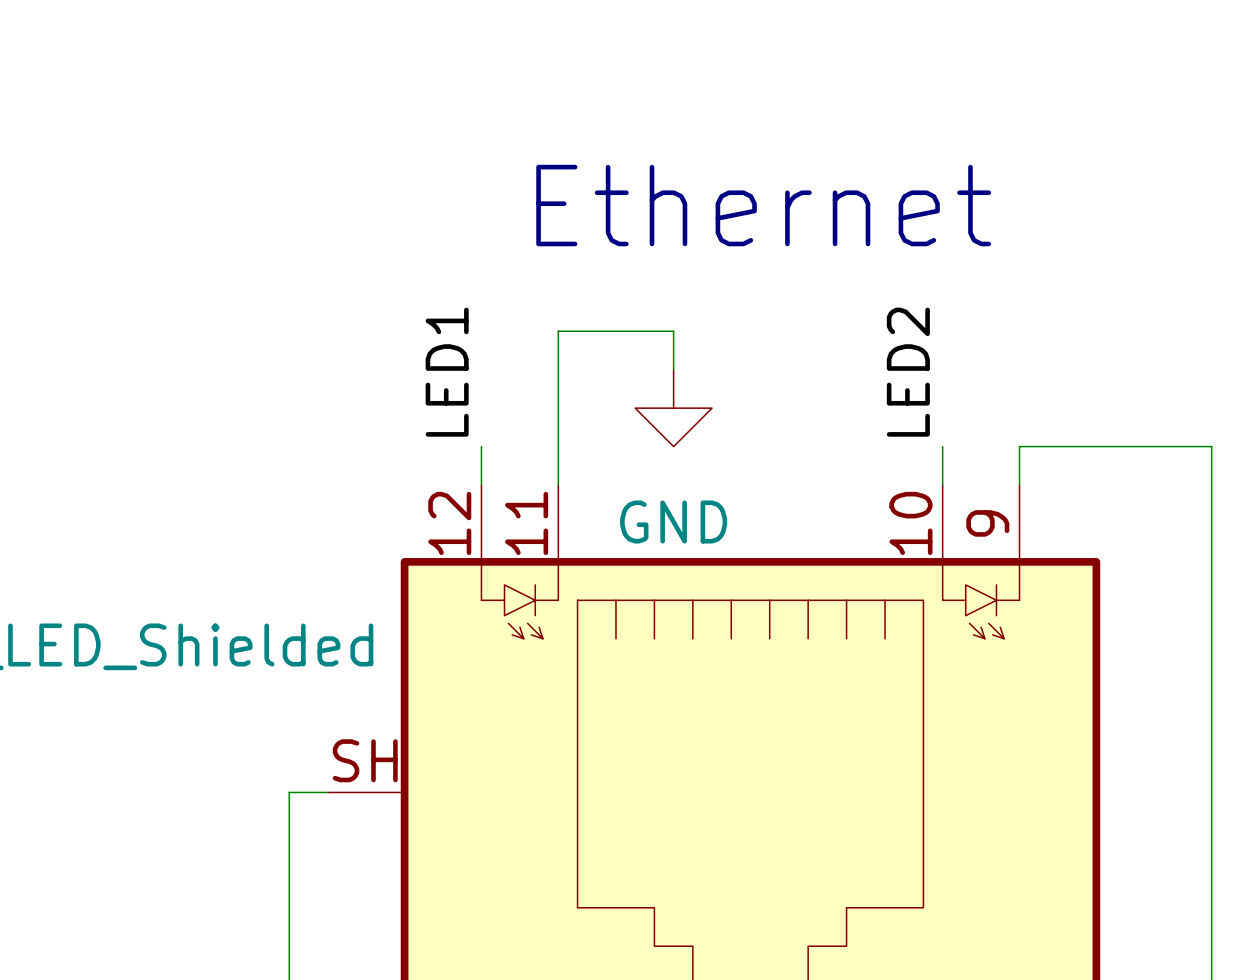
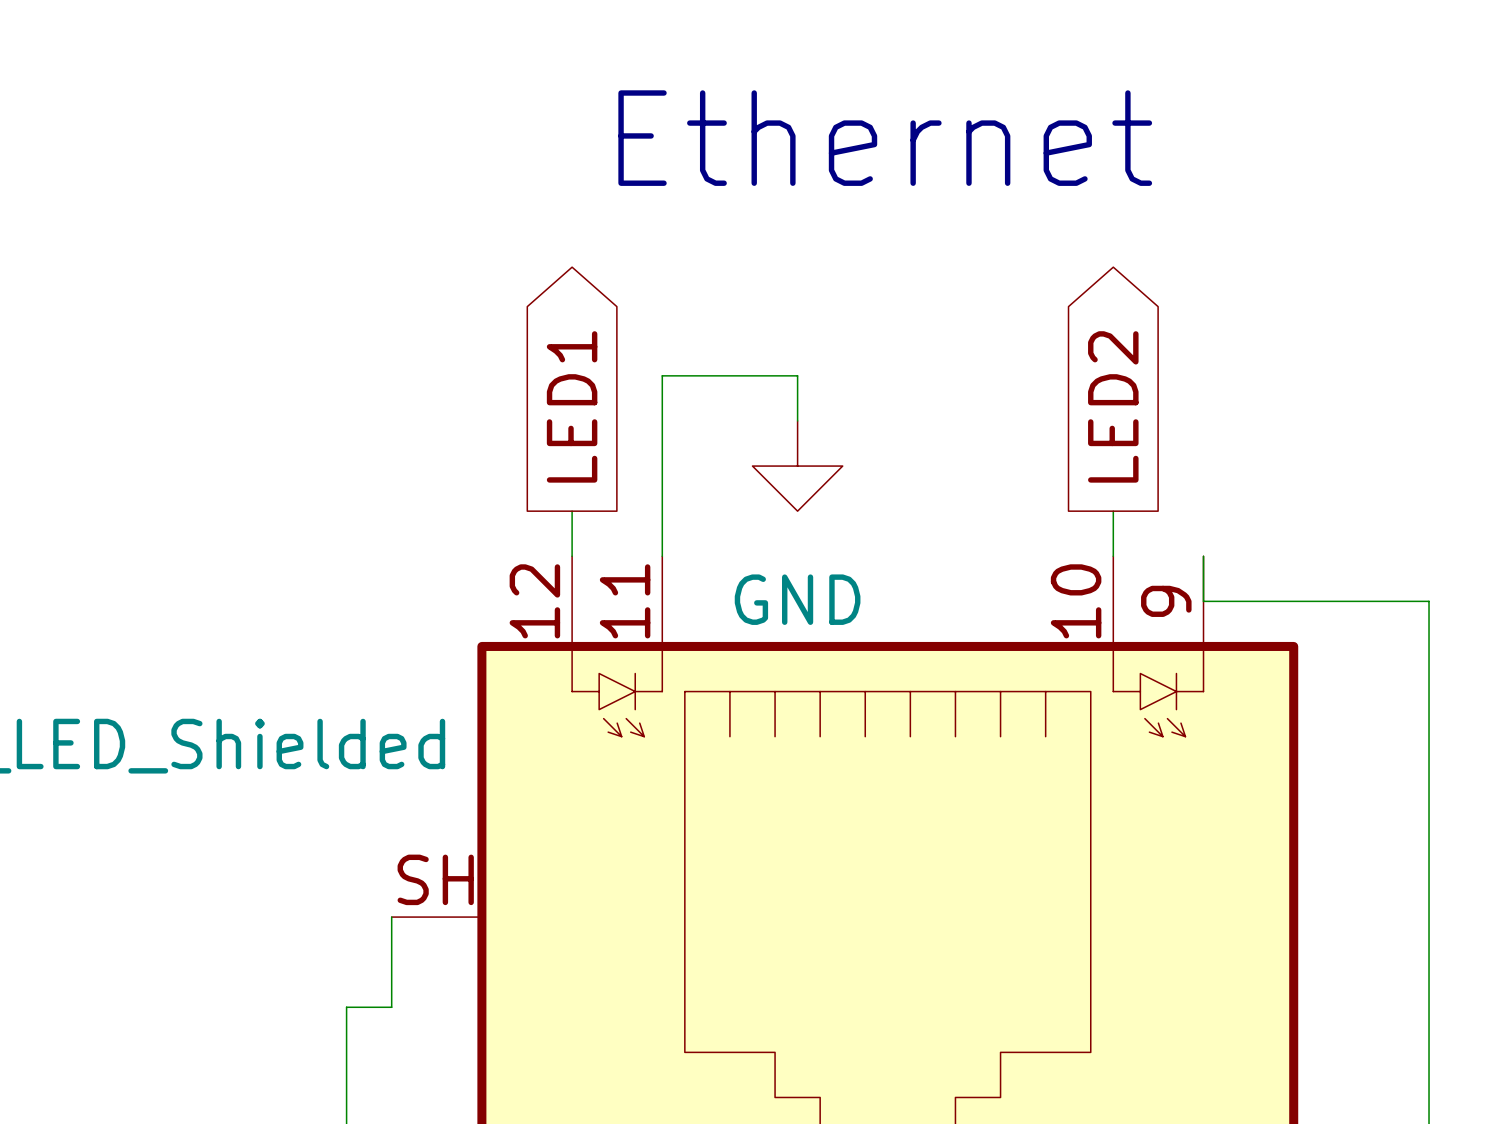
text position: Ethernet (763, 205) -> Ethernet (885, 138)
global label: none -> LED1 (572, 406)
global label: none -> LED2 (1113, 406)
label: LED1 (447, 372) -> none
label: LED2 (908, 372) -> none
wire: (1019, 485) (1019, 446) (1211, 446) (1211, 523) -> (1203, 556) (1203, 601) (1429, 601)
wire: (327, 792) (289, 792) (289, 869) -> (391, 917) (391, 1007) (346, 1007)

